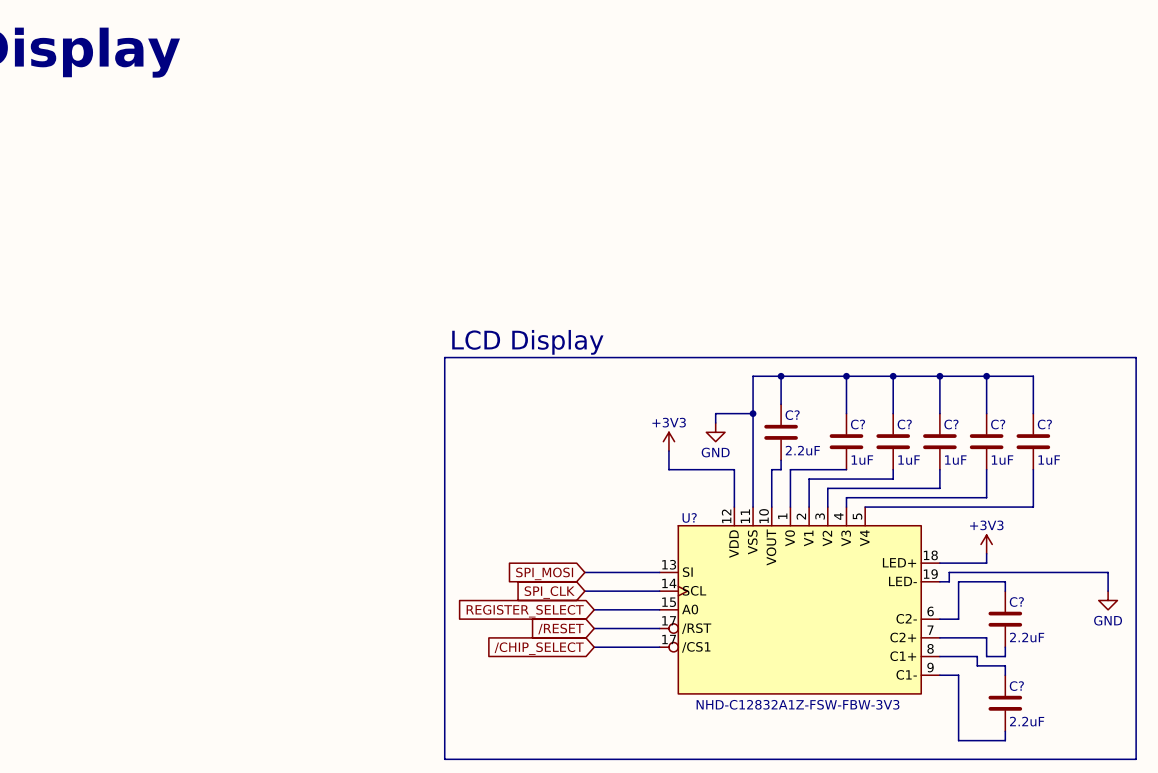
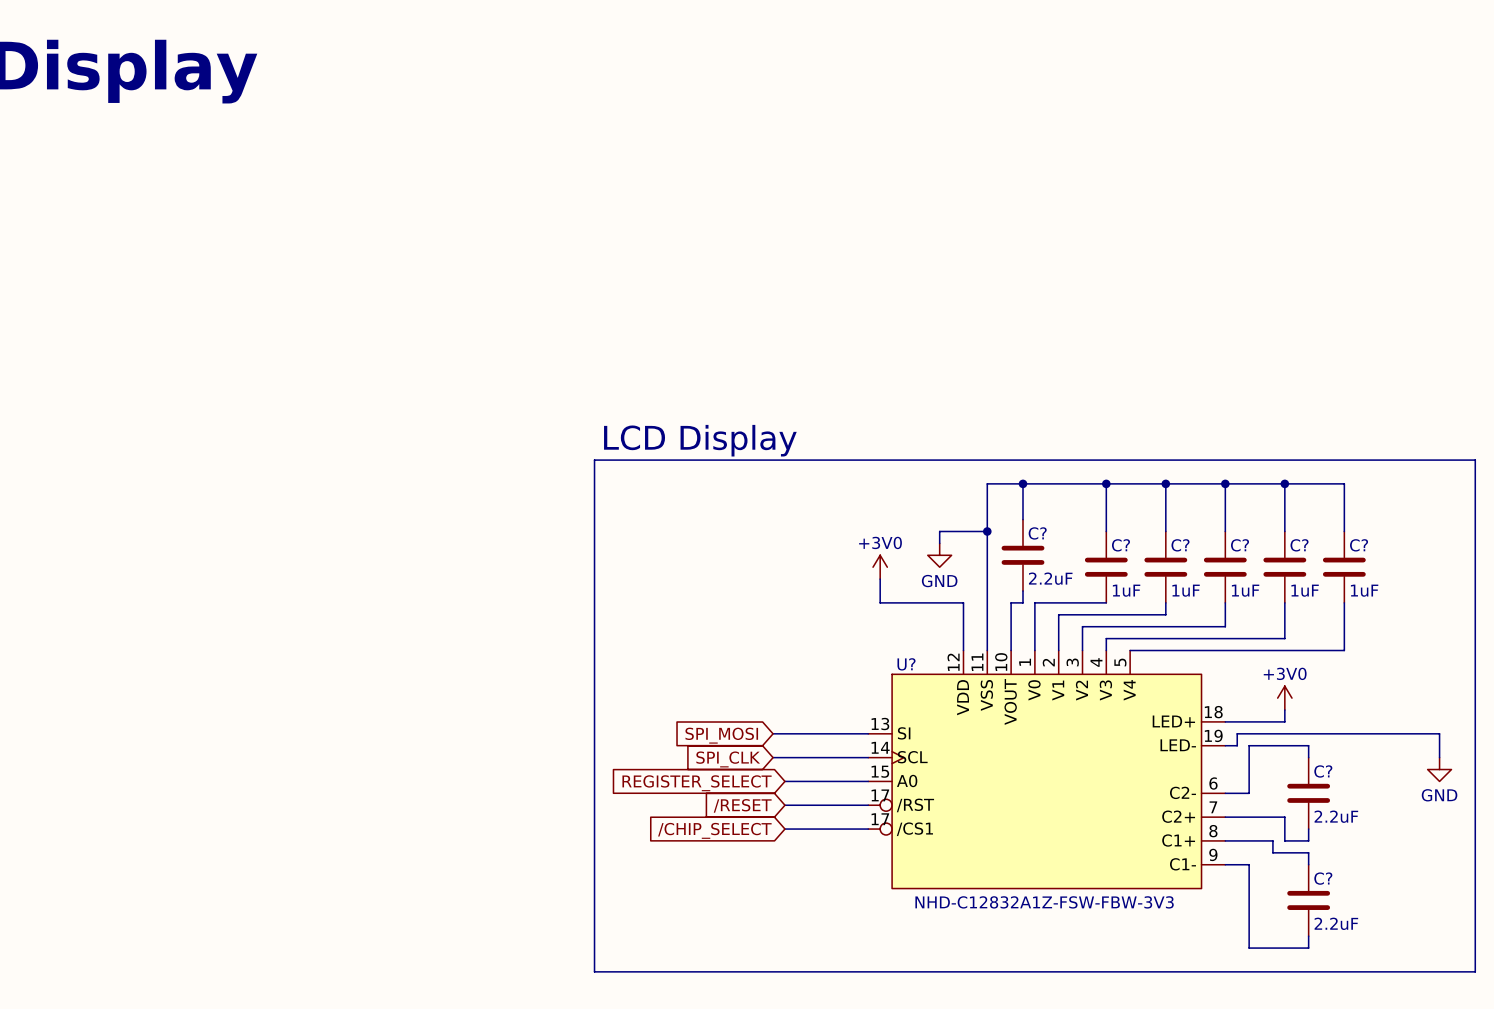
power symbol: +3V3 (668, 441) -> +3V0 (880, 567)
power symbol: +3V3 (986, 544) -> +3V0 (1284, 698)

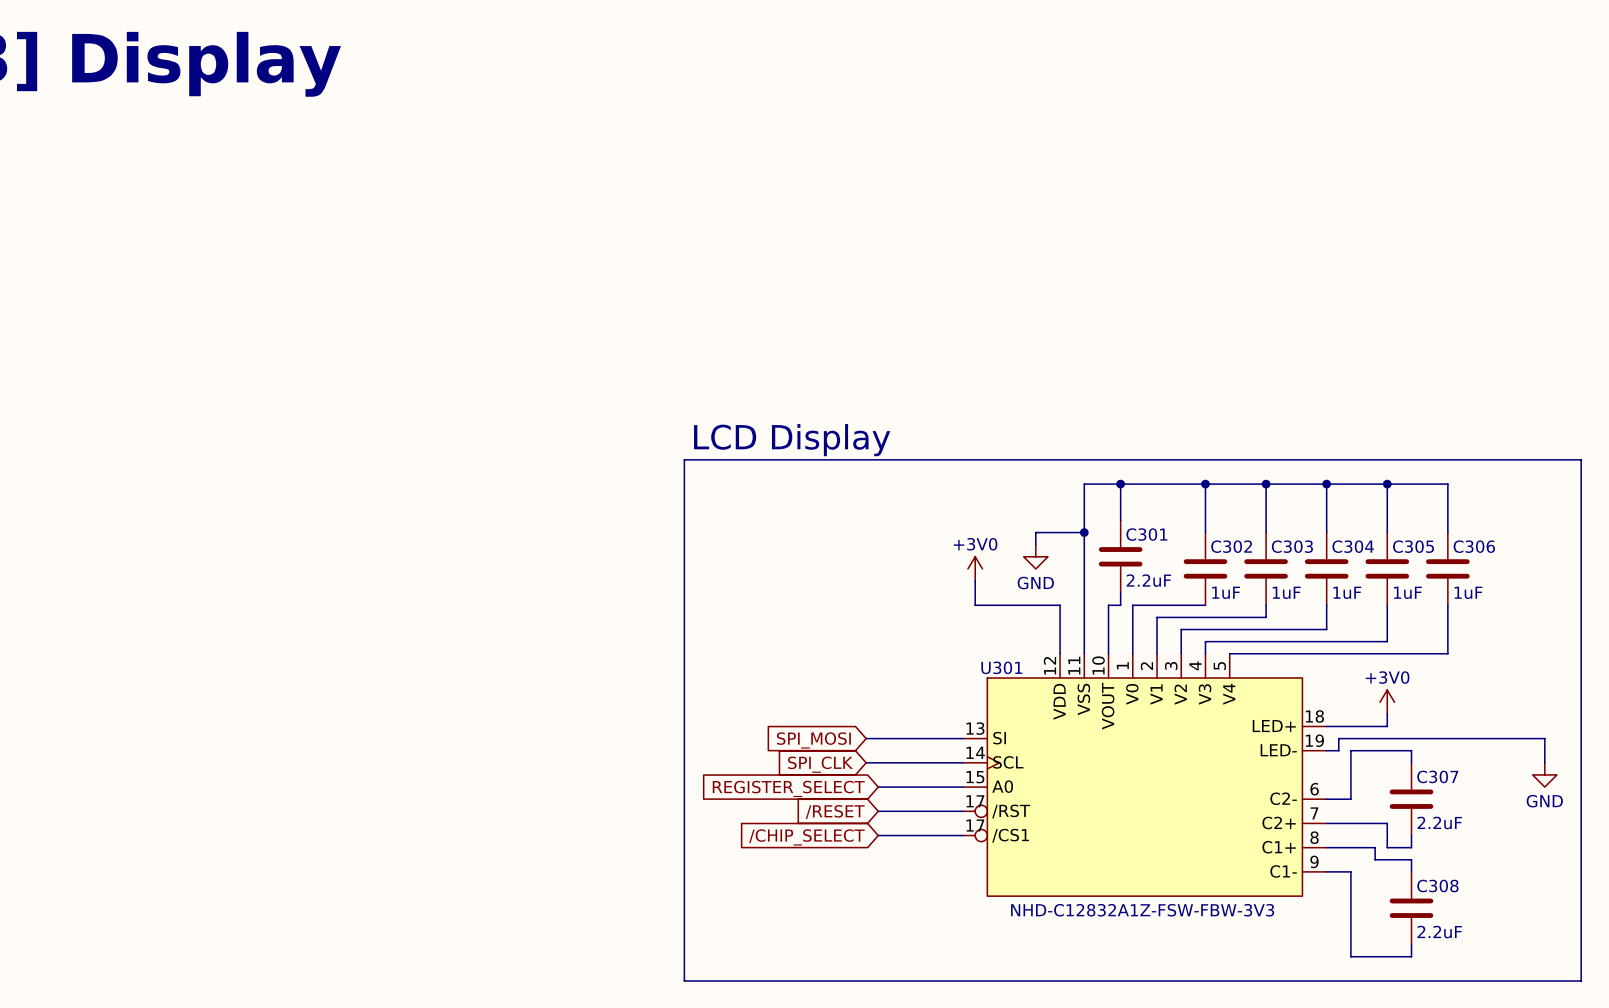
C? name: C? (1037, 533) -> C301 (1146, 534)
C? name: C? (1120, 545) -> C302 (1231, 546)
C? name: C? (1180, 545) -> C303 (1292, 546)
C? name: C? (1240, 545) -> C304 (1353, 546)
C? name: C? (1299, 545) -> C305 (1413, 546)
C? name: C? (1359, 545) -> C306 (1474, 546)
U? name: U? (906, 664) -> U301 (1001, 667)
C? name: C? (1323, 771) -> C307 (1437, 776)
C? name: C? (1323, 878) -> C308 (1437, 886)

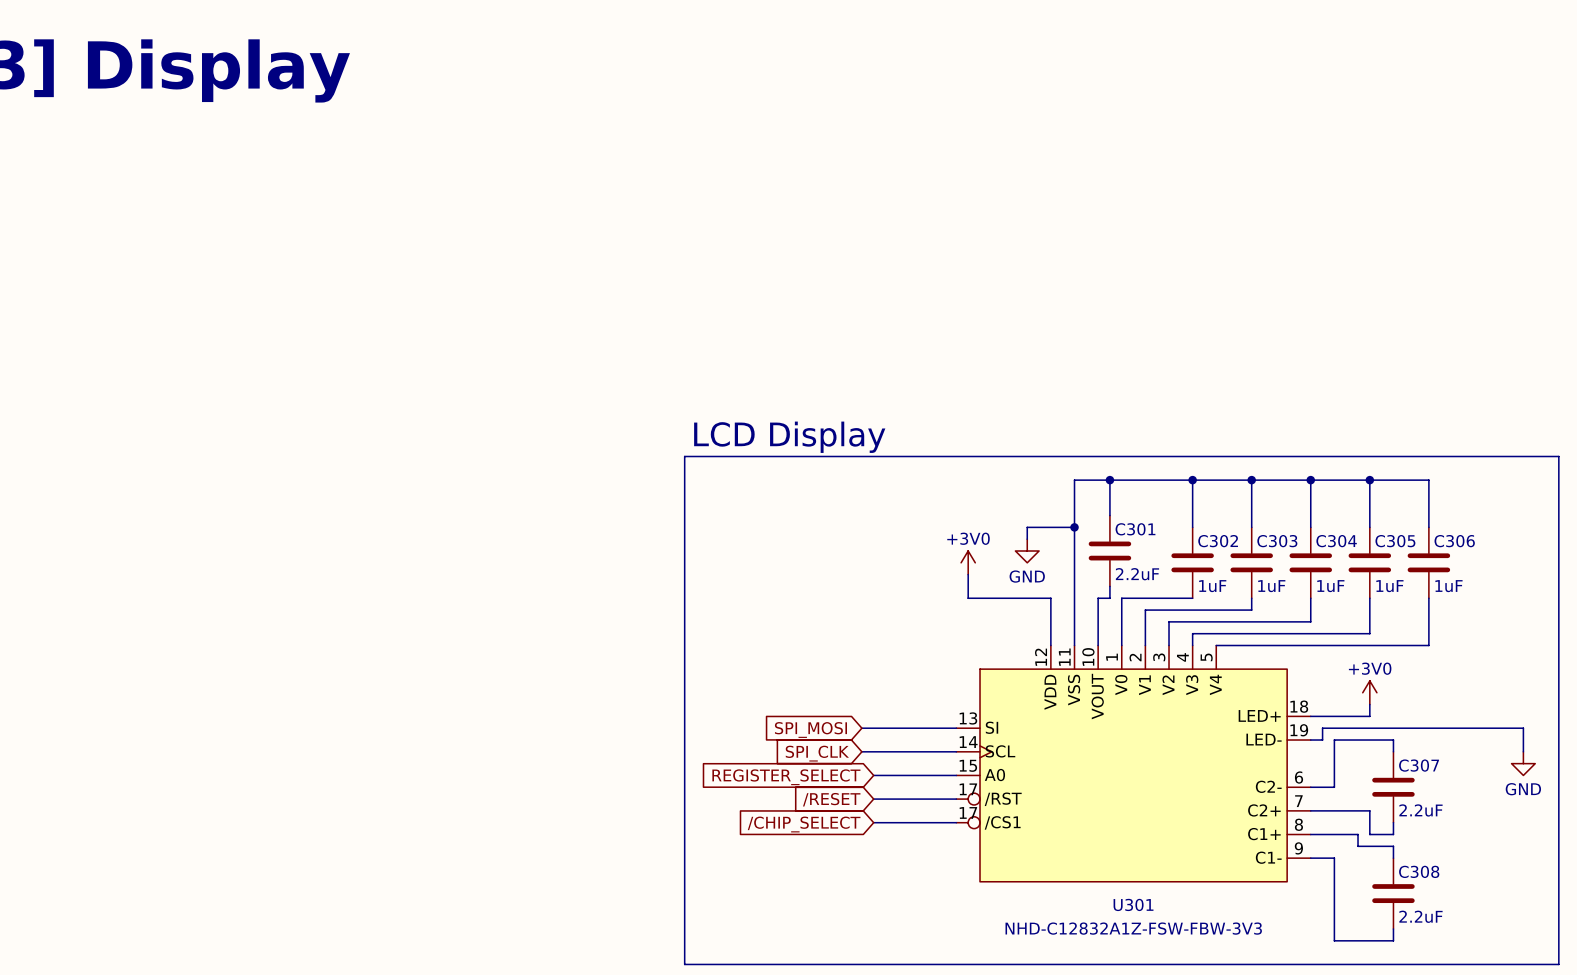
U301 name position: U301 (1001, 667) -> U301 (1133, 904)
U301 value position: NHD-C12832A1Z-FSW-FBW-3V3 (1142, 910) -> NHD-C12832A1Z-FSW-FBW-3V3 (1133, 928)

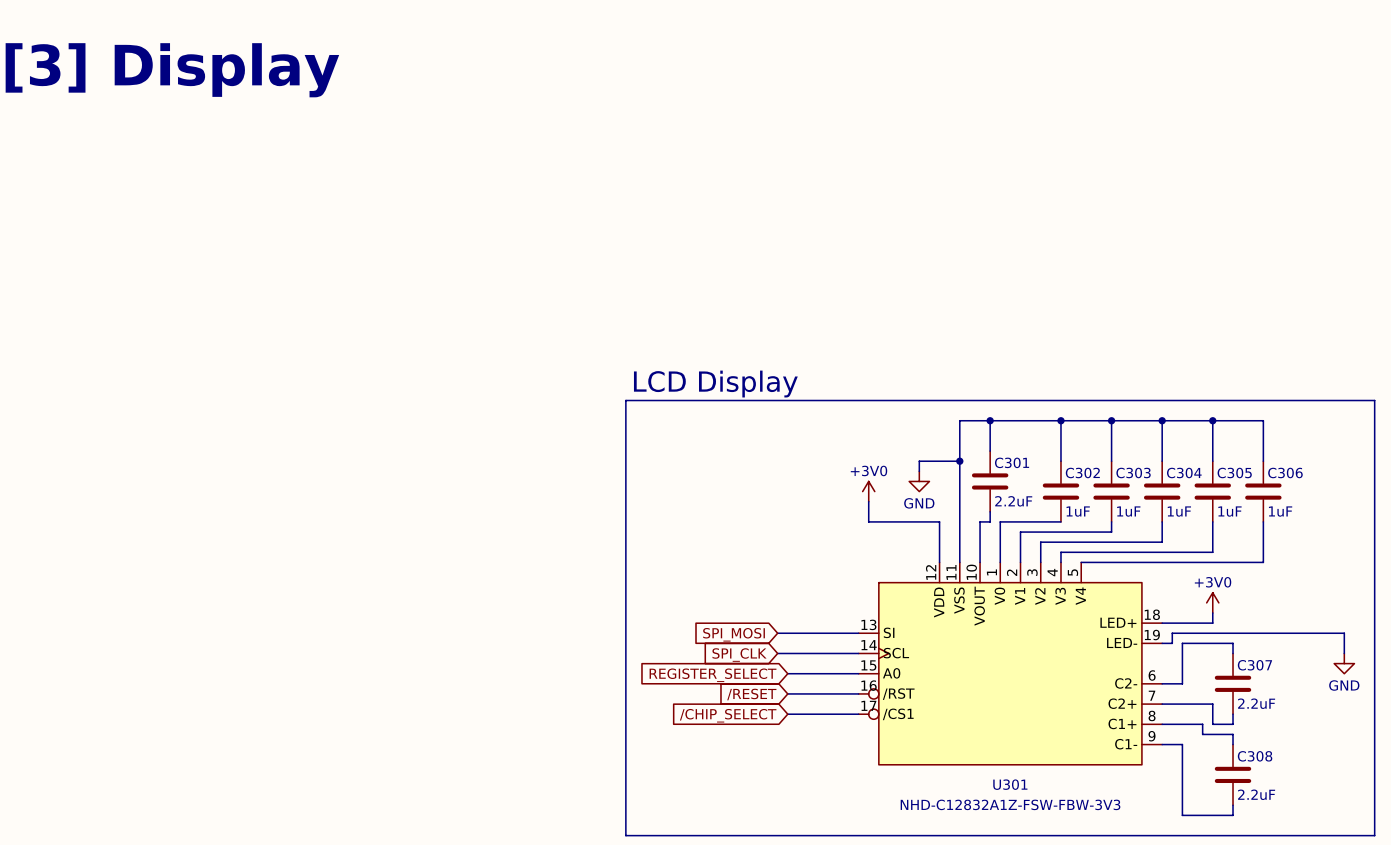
U301 pin number: 17 (968, 789) -> 16 (869, 685)

